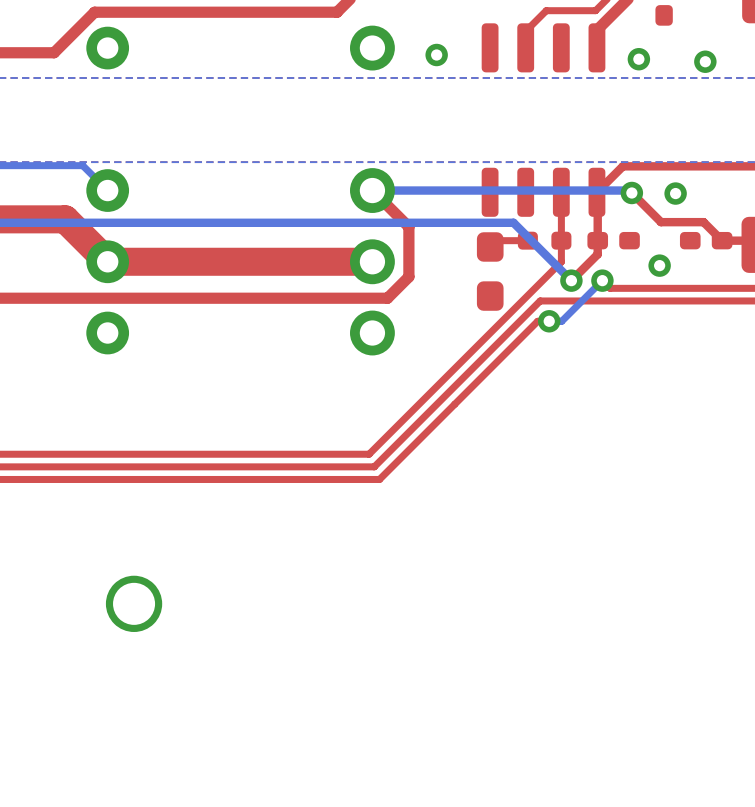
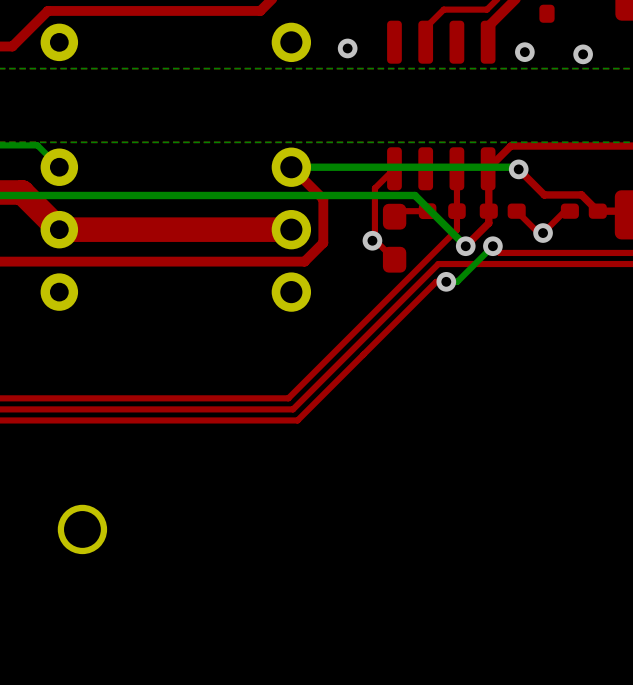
top track: none -> (394, 168) (374, 188) (374, 240) (394, 259)
via: (675, 193) -> none
top track: none -> (569, 211) (564, 211) (543, 233) (538, 233) (516, 211)
via: none -> (372, 240)

